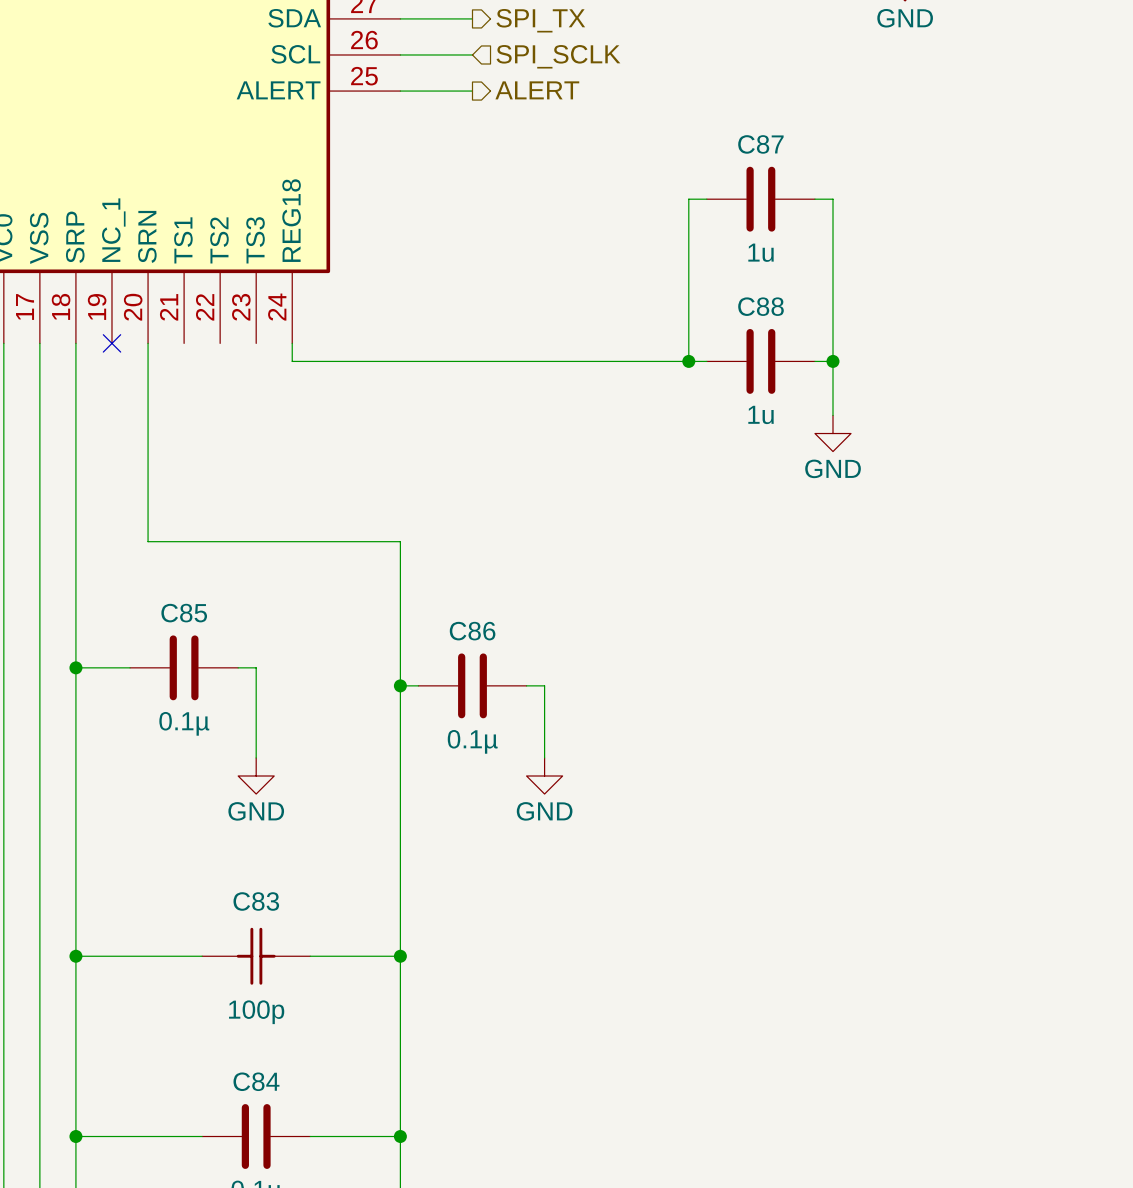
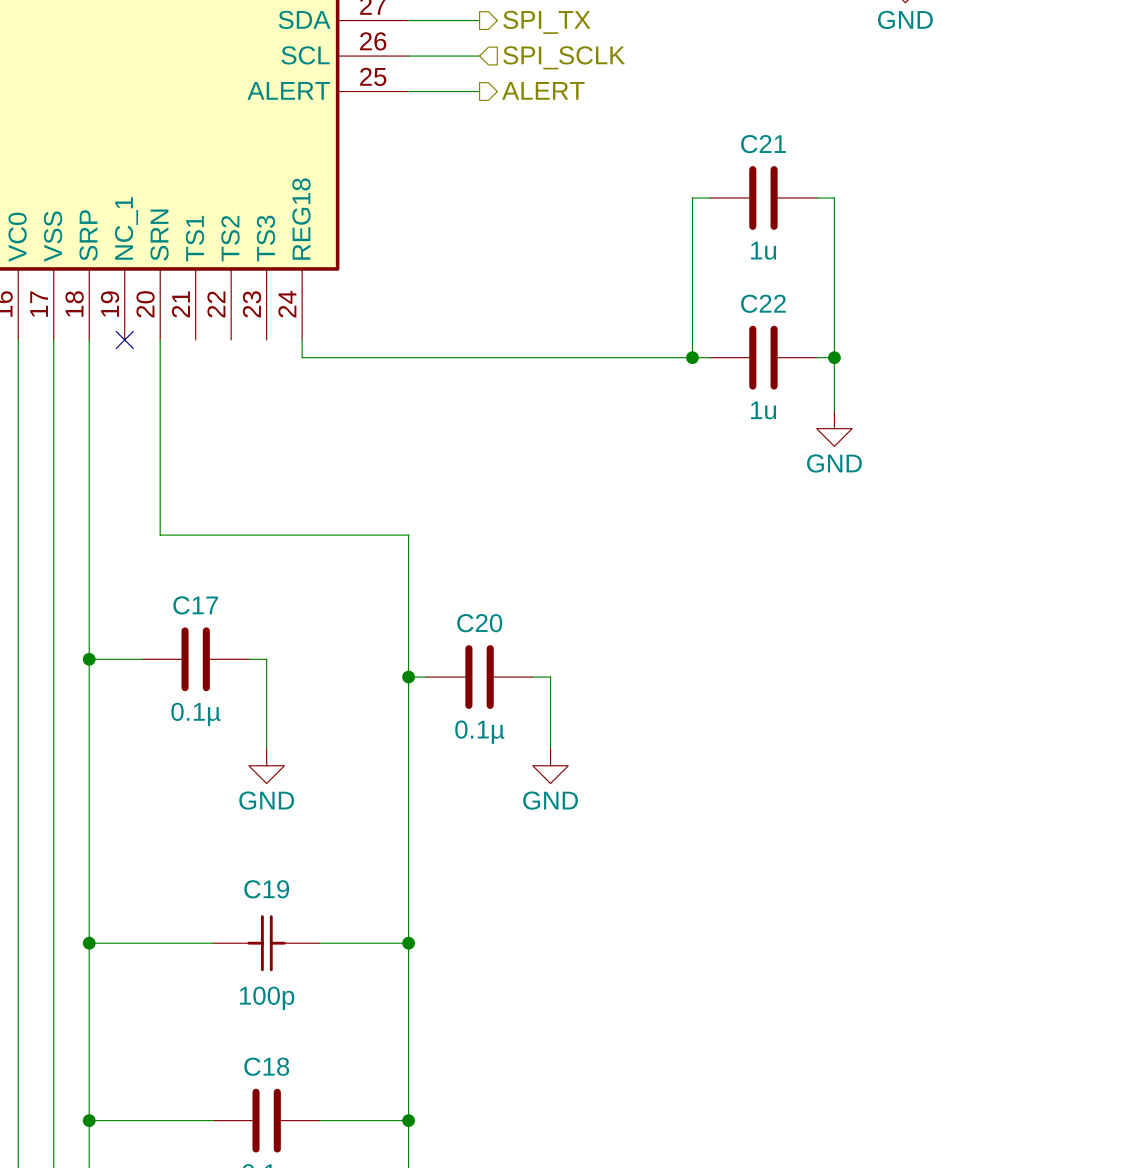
C87 name: C87 (760, 144) -> C21 (763, 144)
C88 name: C88 (760, 306) -> C22 (763, 303)
C85 name: C85 (184, 613) -> C17 (195, 605)
C86 name: C86 (472, 631) -> C20 (479, 623)
C83 name: C83 (256, 901) -> C19 (266, 889)
C84 name: C84 (256, 1081) -> C18 (266, 1066)

